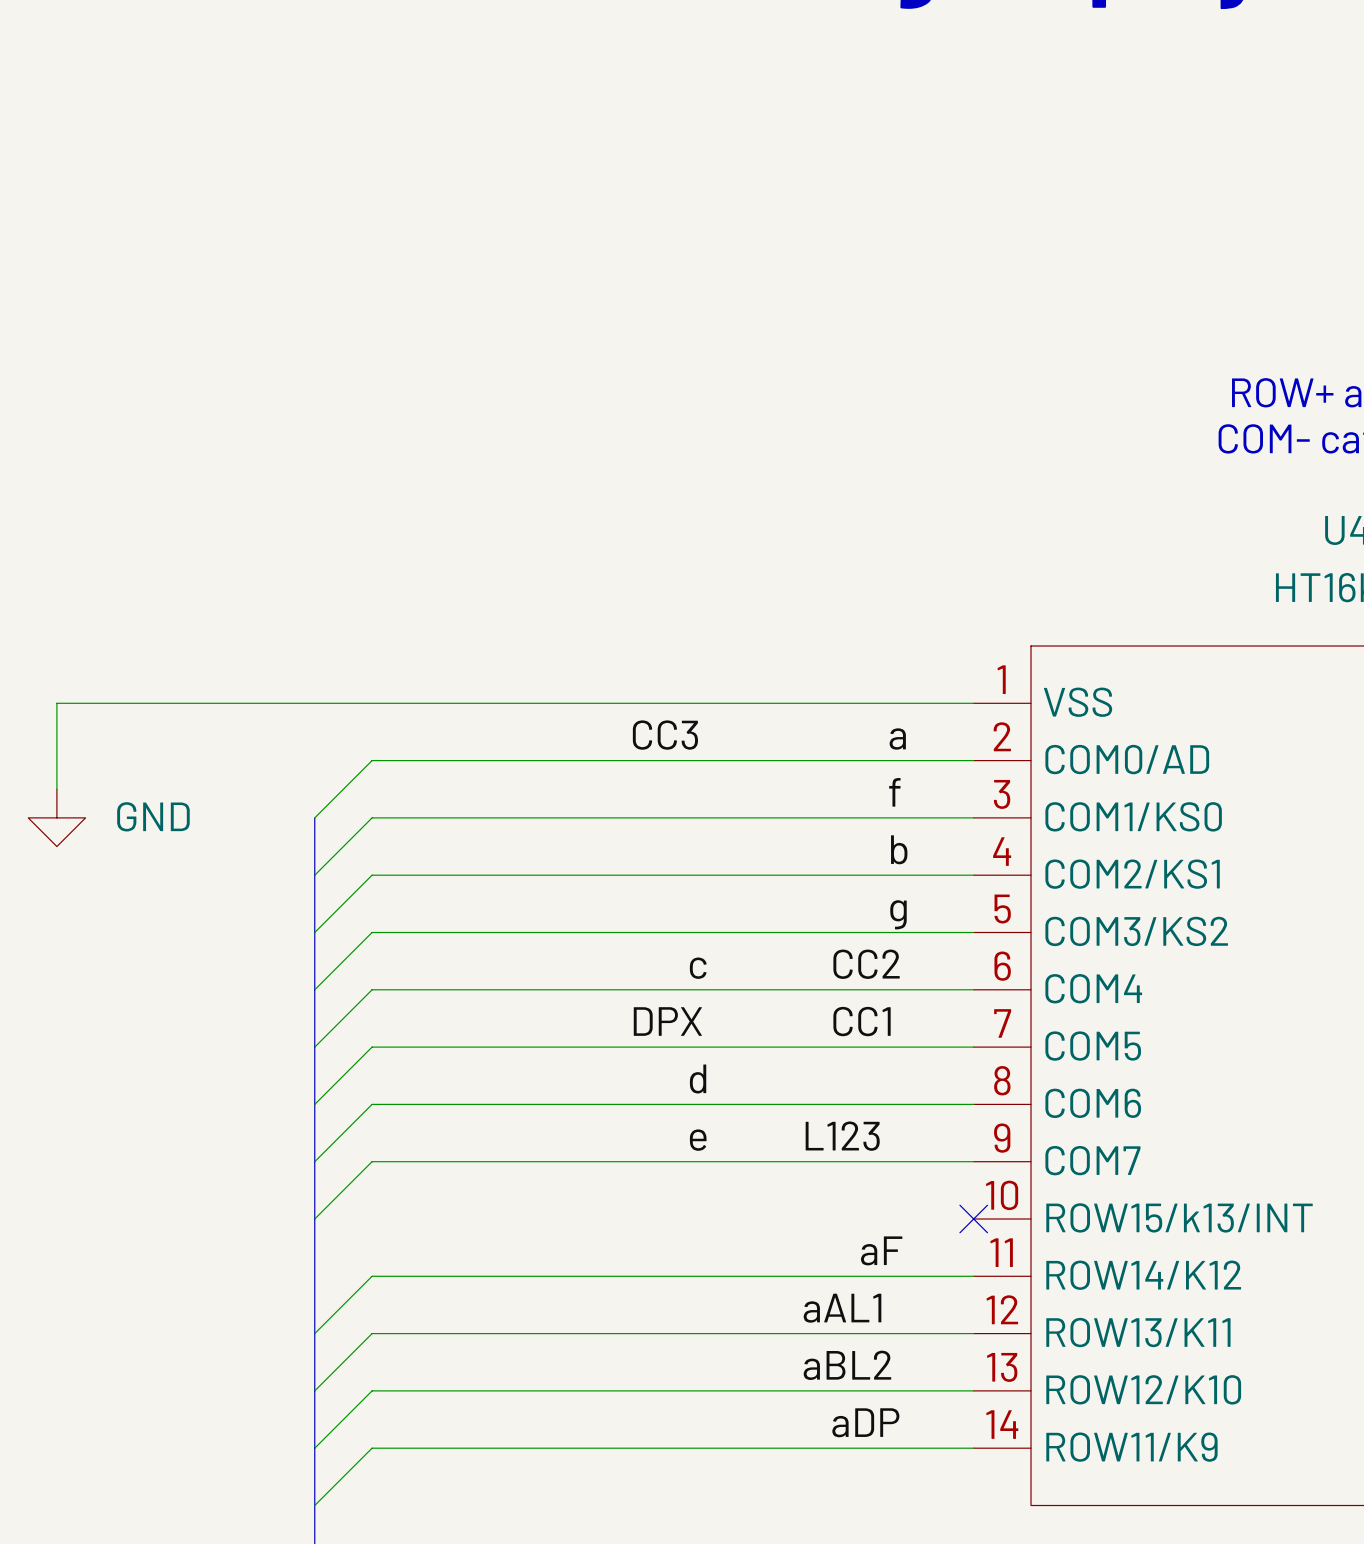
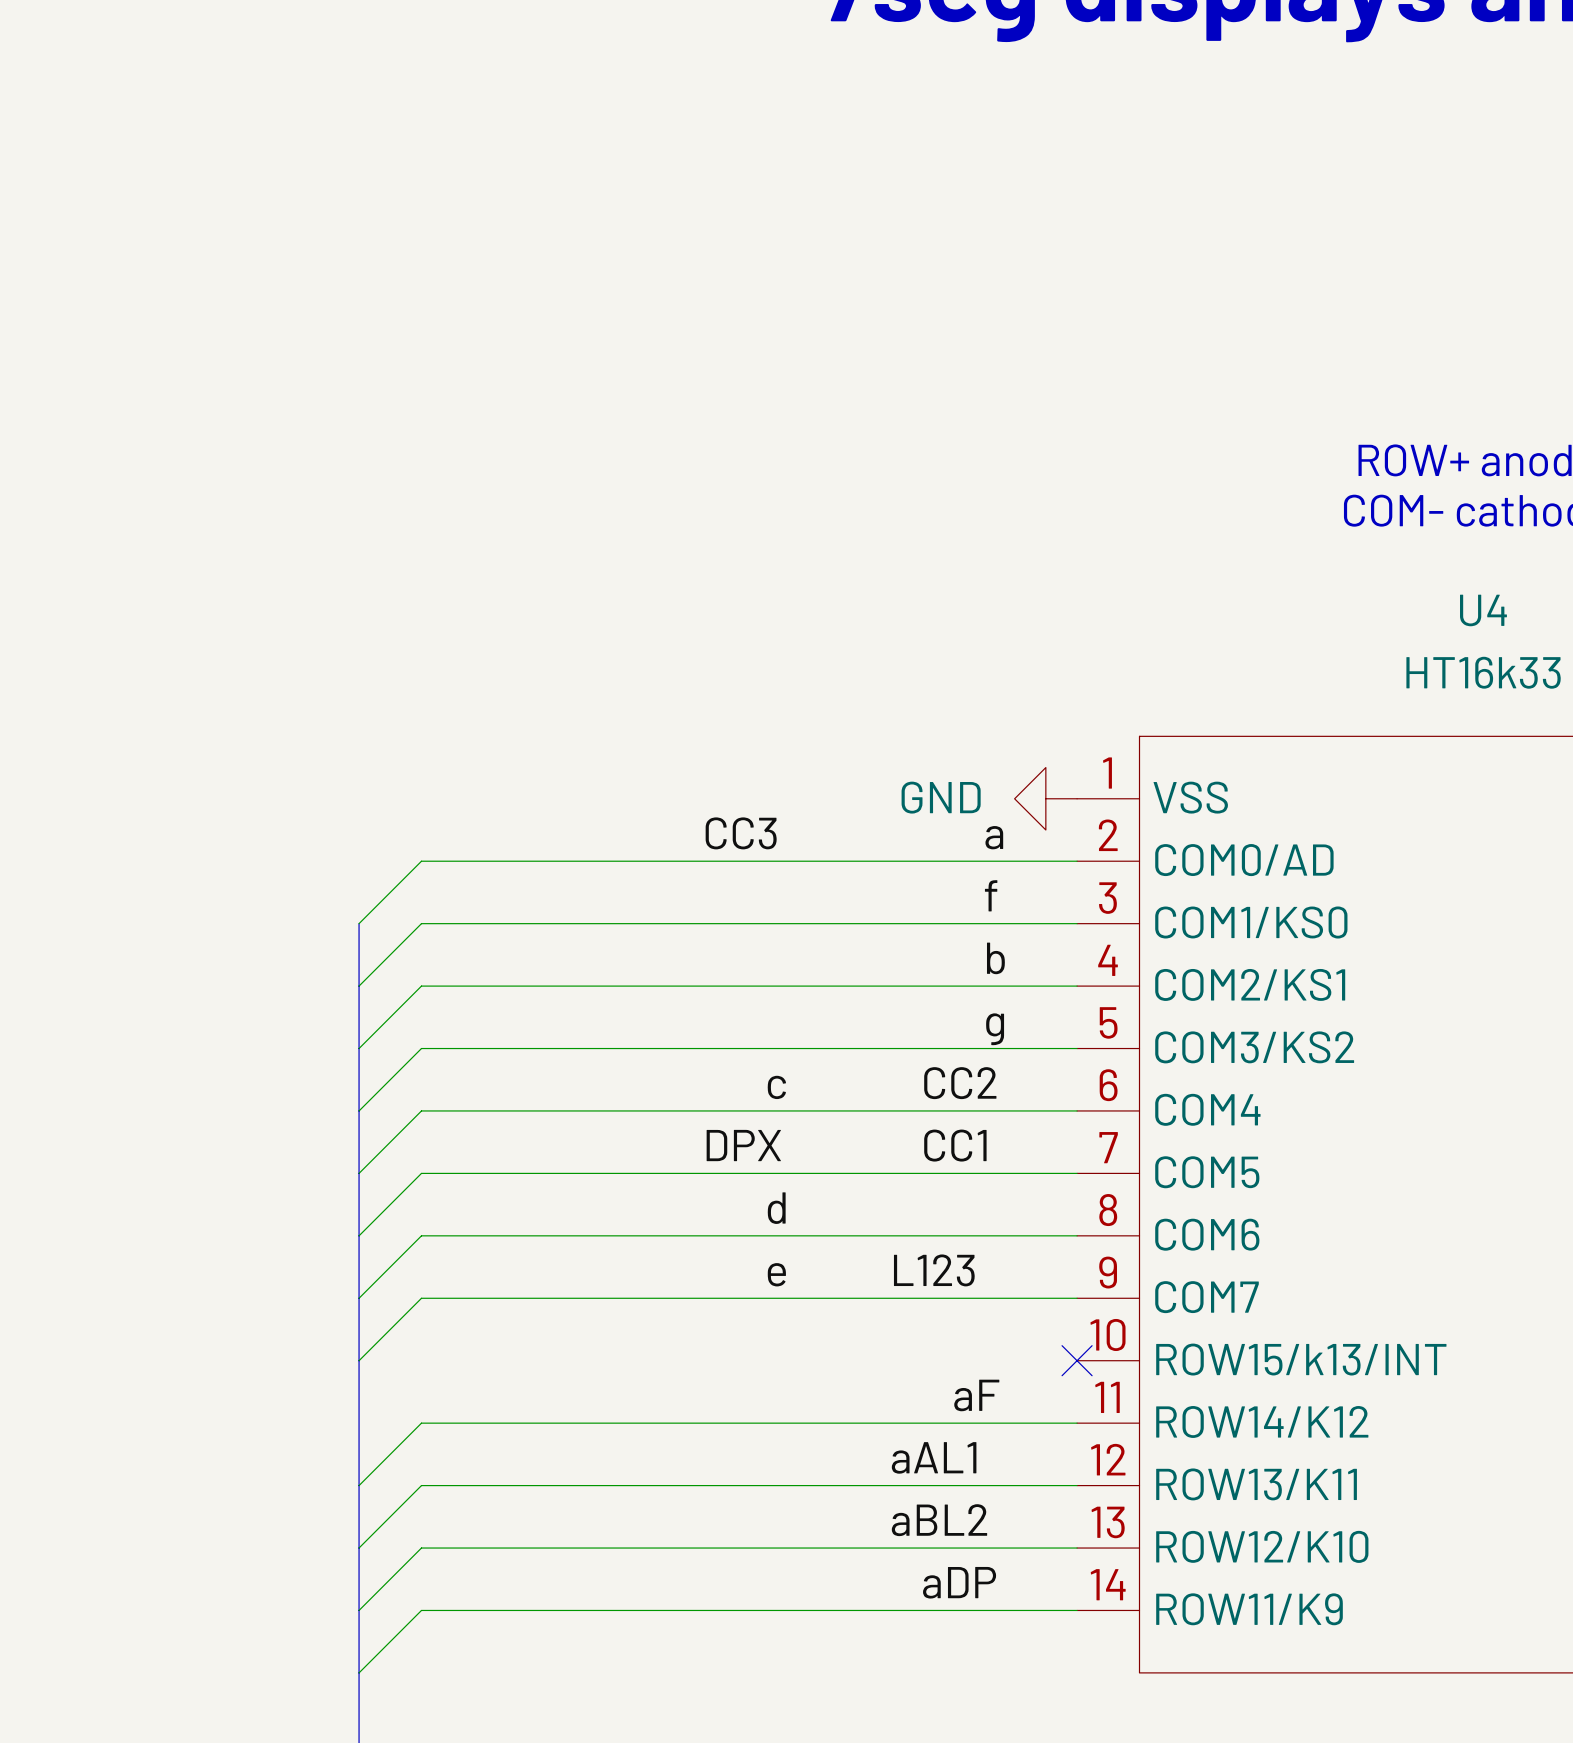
power symbol: none -> GND (1045, 798)
wire: (973, 703) (56, 703) (56, 789) -> none
power symbol: GND (56, 817) -> none

